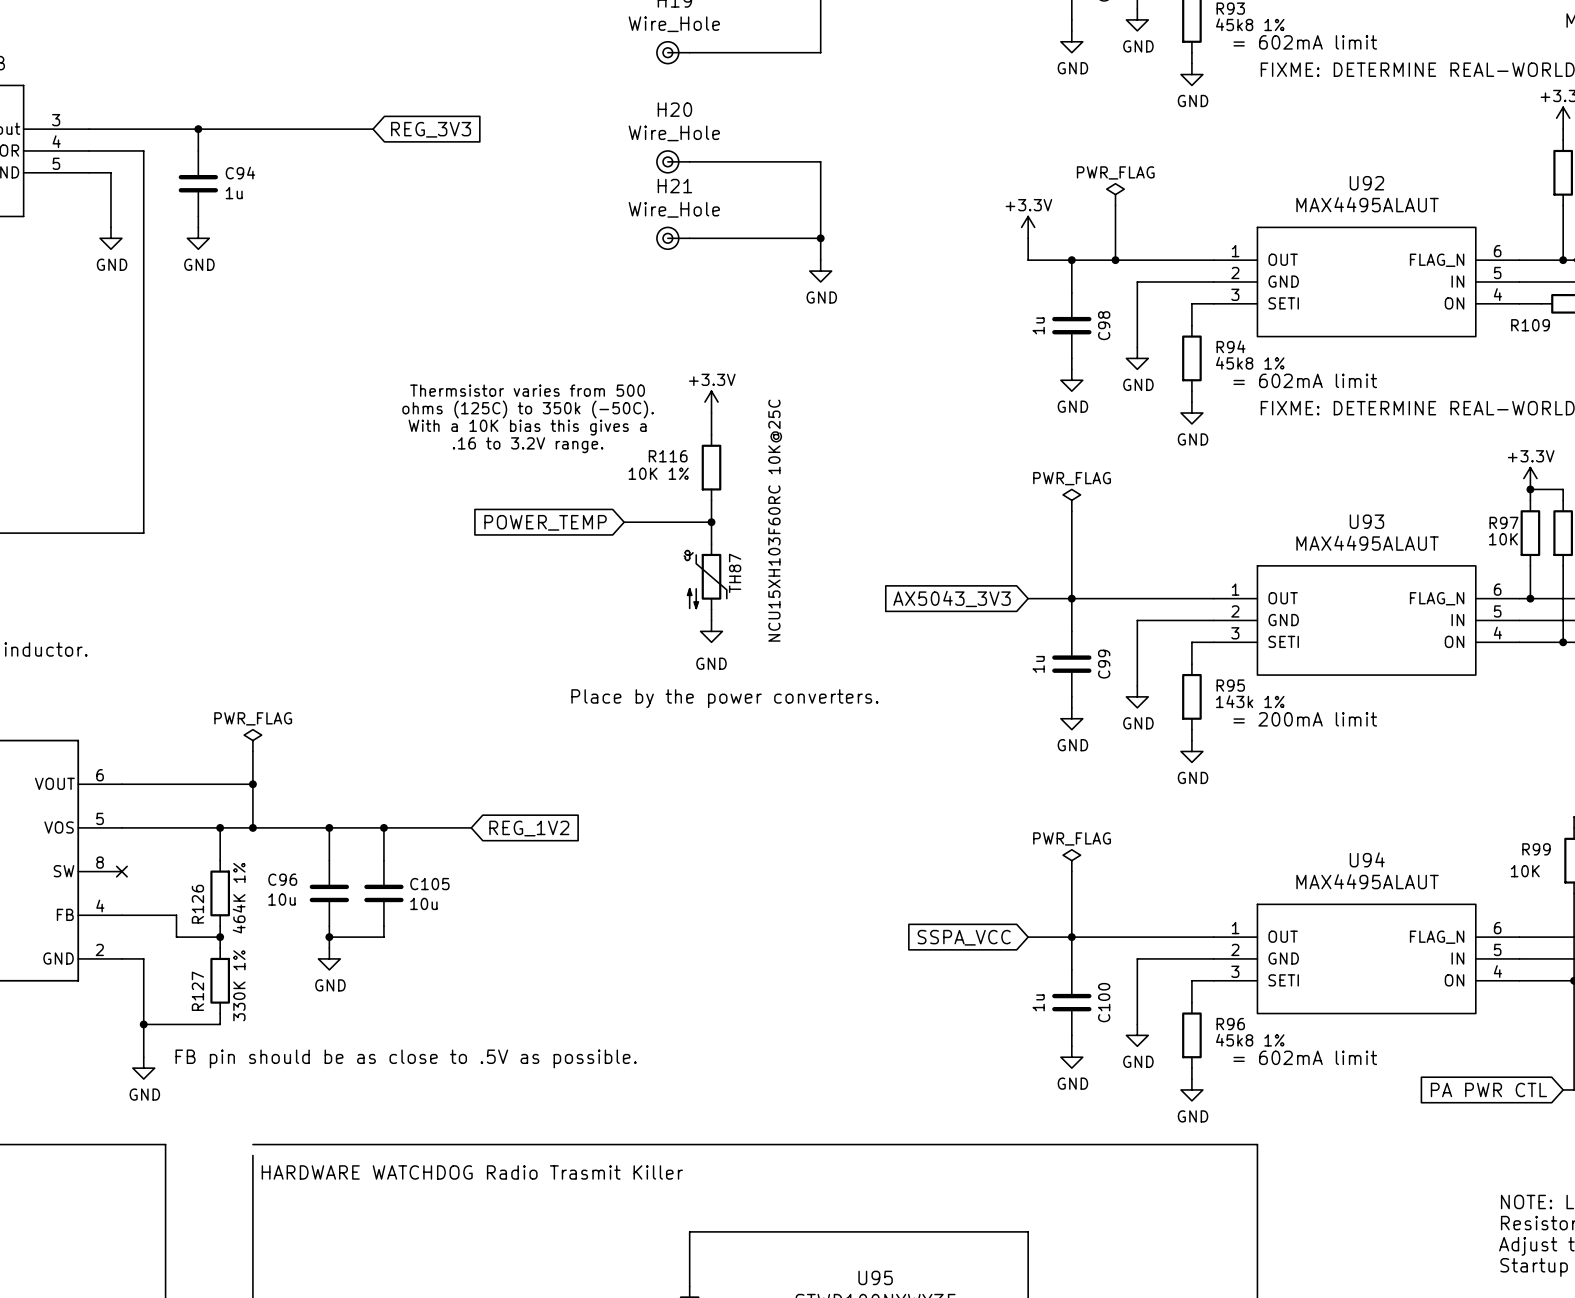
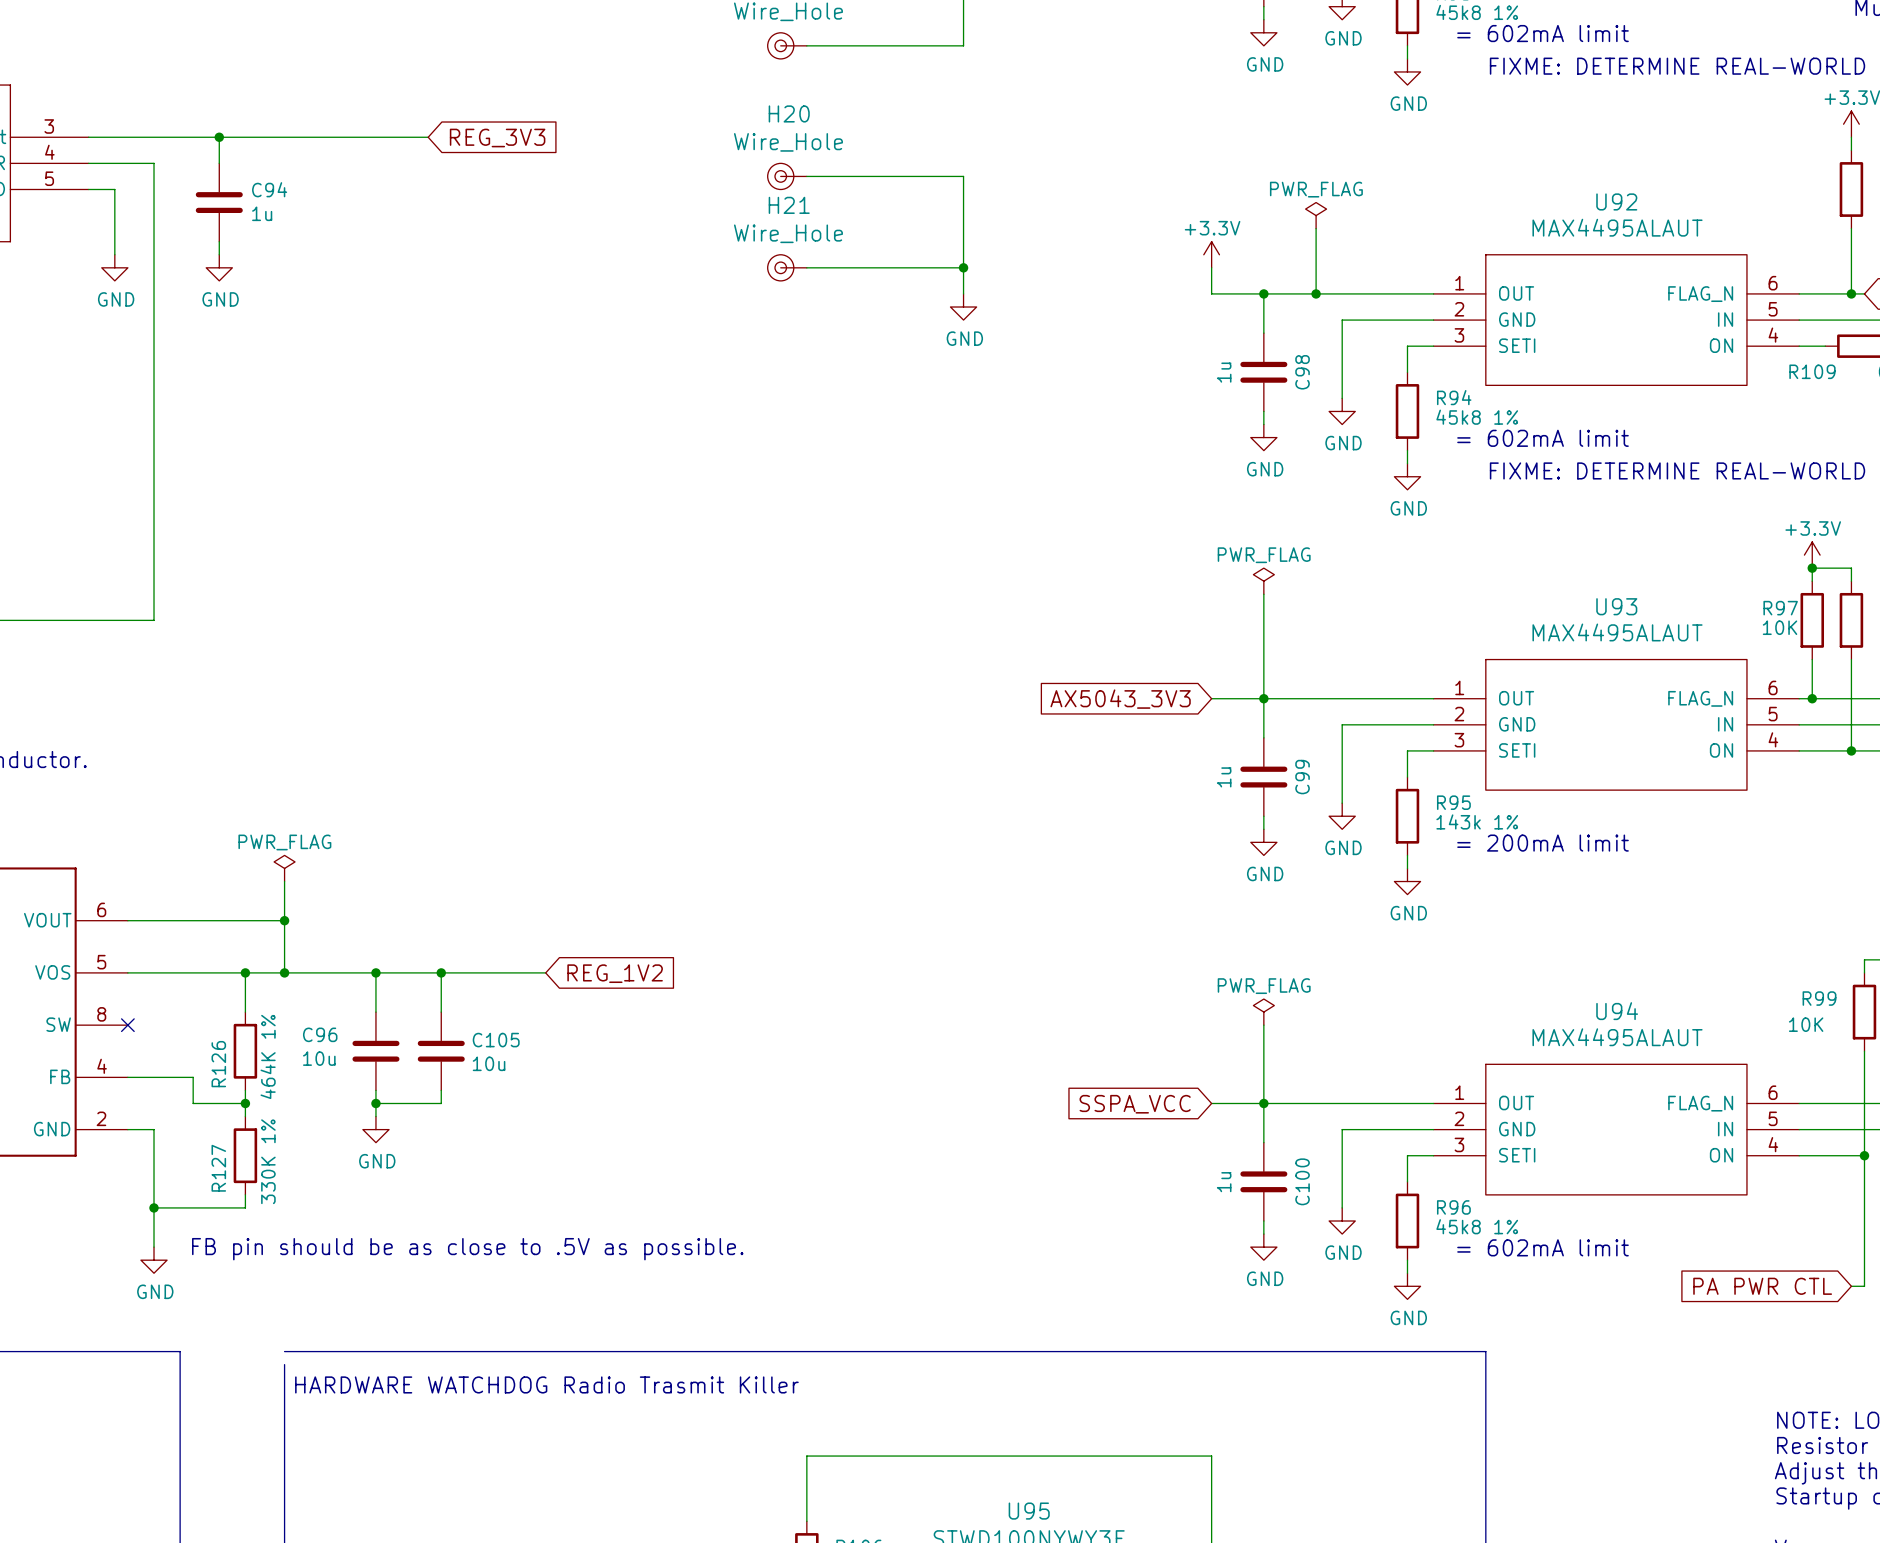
text: Thermsistor varies from 500 (527, 390) -> none
power symbol: +3.3V (711, 402) -> none
text: ohms (125C) to 350k (-50C). (528, 409) -> none
wire: (711, 413) (711, 434) -> none
text: With a 10K bias this gives a (527, 427) -> none
text: .16 to 3.2V range. (528, 445) -> none
R116: 10K 1% (711, 467) -> none
wire: (711, 500) (711, 544) -> none
global label: POWER_TEMP (545, 522) -> none
wire: (624, 522) (711, 522) -> none
junction: (711, 522) -> none
TH87: NCU15XH103F60RC 10K@25C (705, 576) -> none
wire: (711, 609) (711, 620) -> none
power symbol: GND (711, 631) -> none
text: Place by the power converters. (724, 698) -> none

